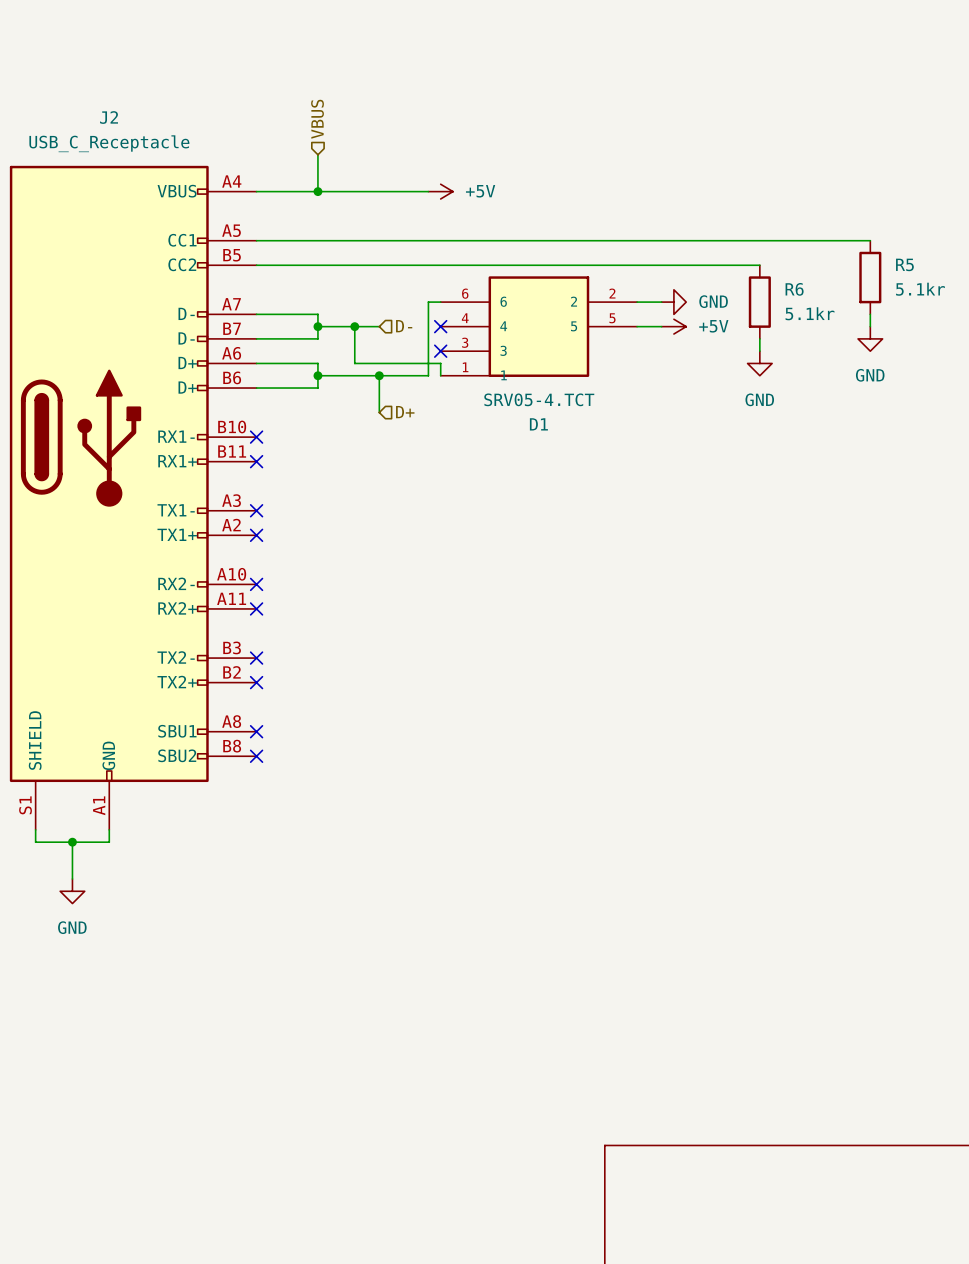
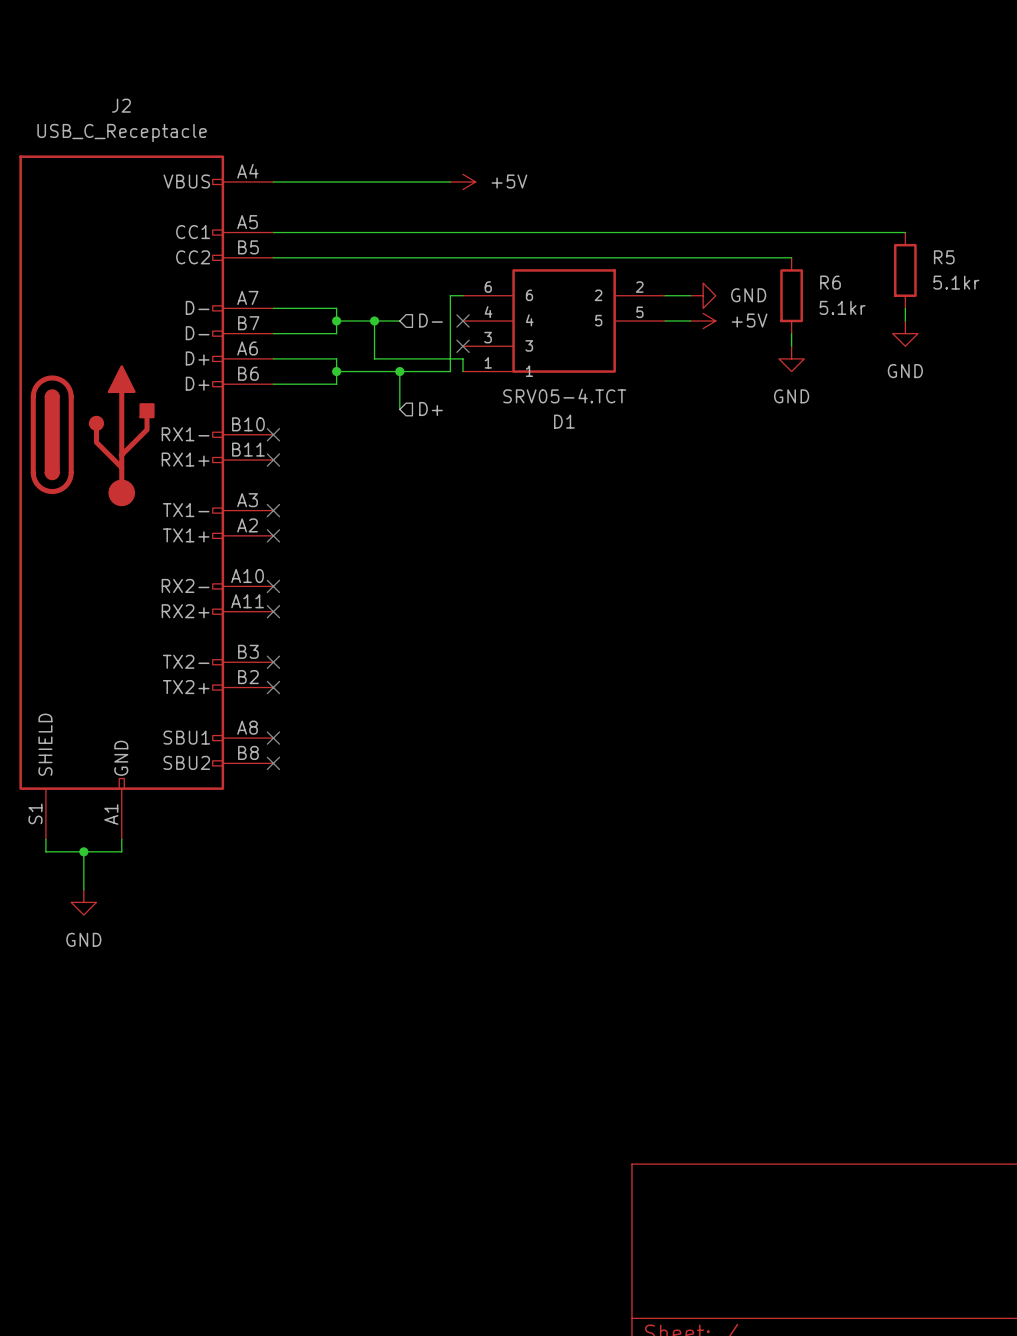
hierarchical label: VBUS (317, 119) -> none
wire: (317, 154) (317, 191) -> none
junction: (317, 191) -> none

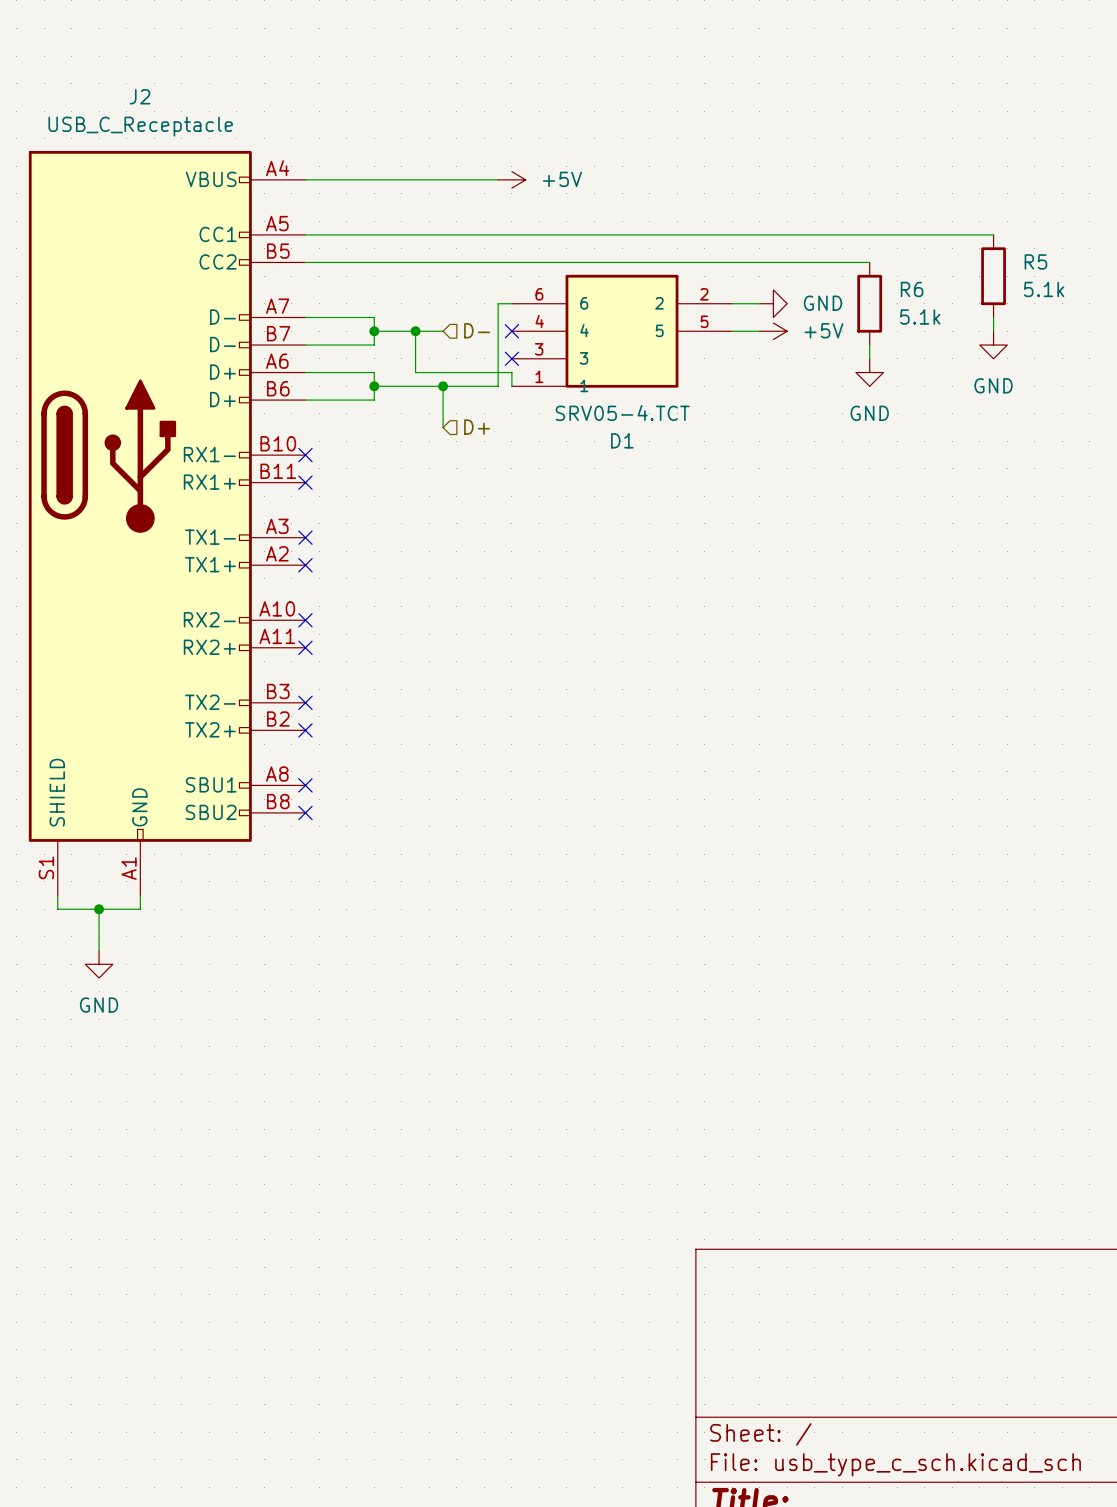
R5 value: 5.1kr (956, 282) -> 5.1k (1044, 289)
R6 value: 5.1kr (842, 307) -> 5.1k (920, 316)

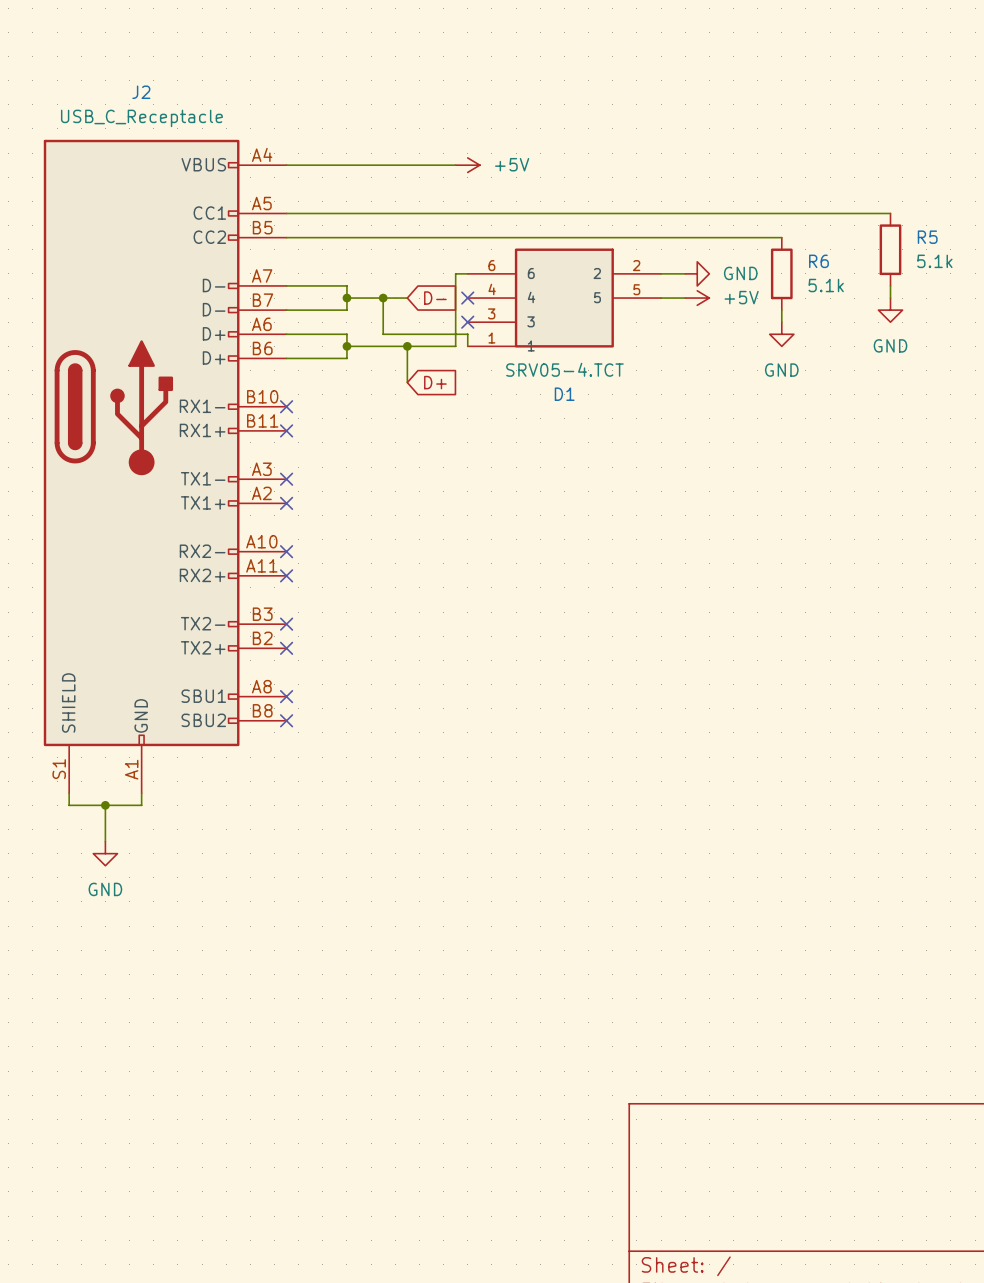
hierarchical label: D- (477, 330) -> none
global label: none -> D- (435, 298)
global label: none -> D+ (435, 382)
hierarchical label: D+ (477, 427) -> none

